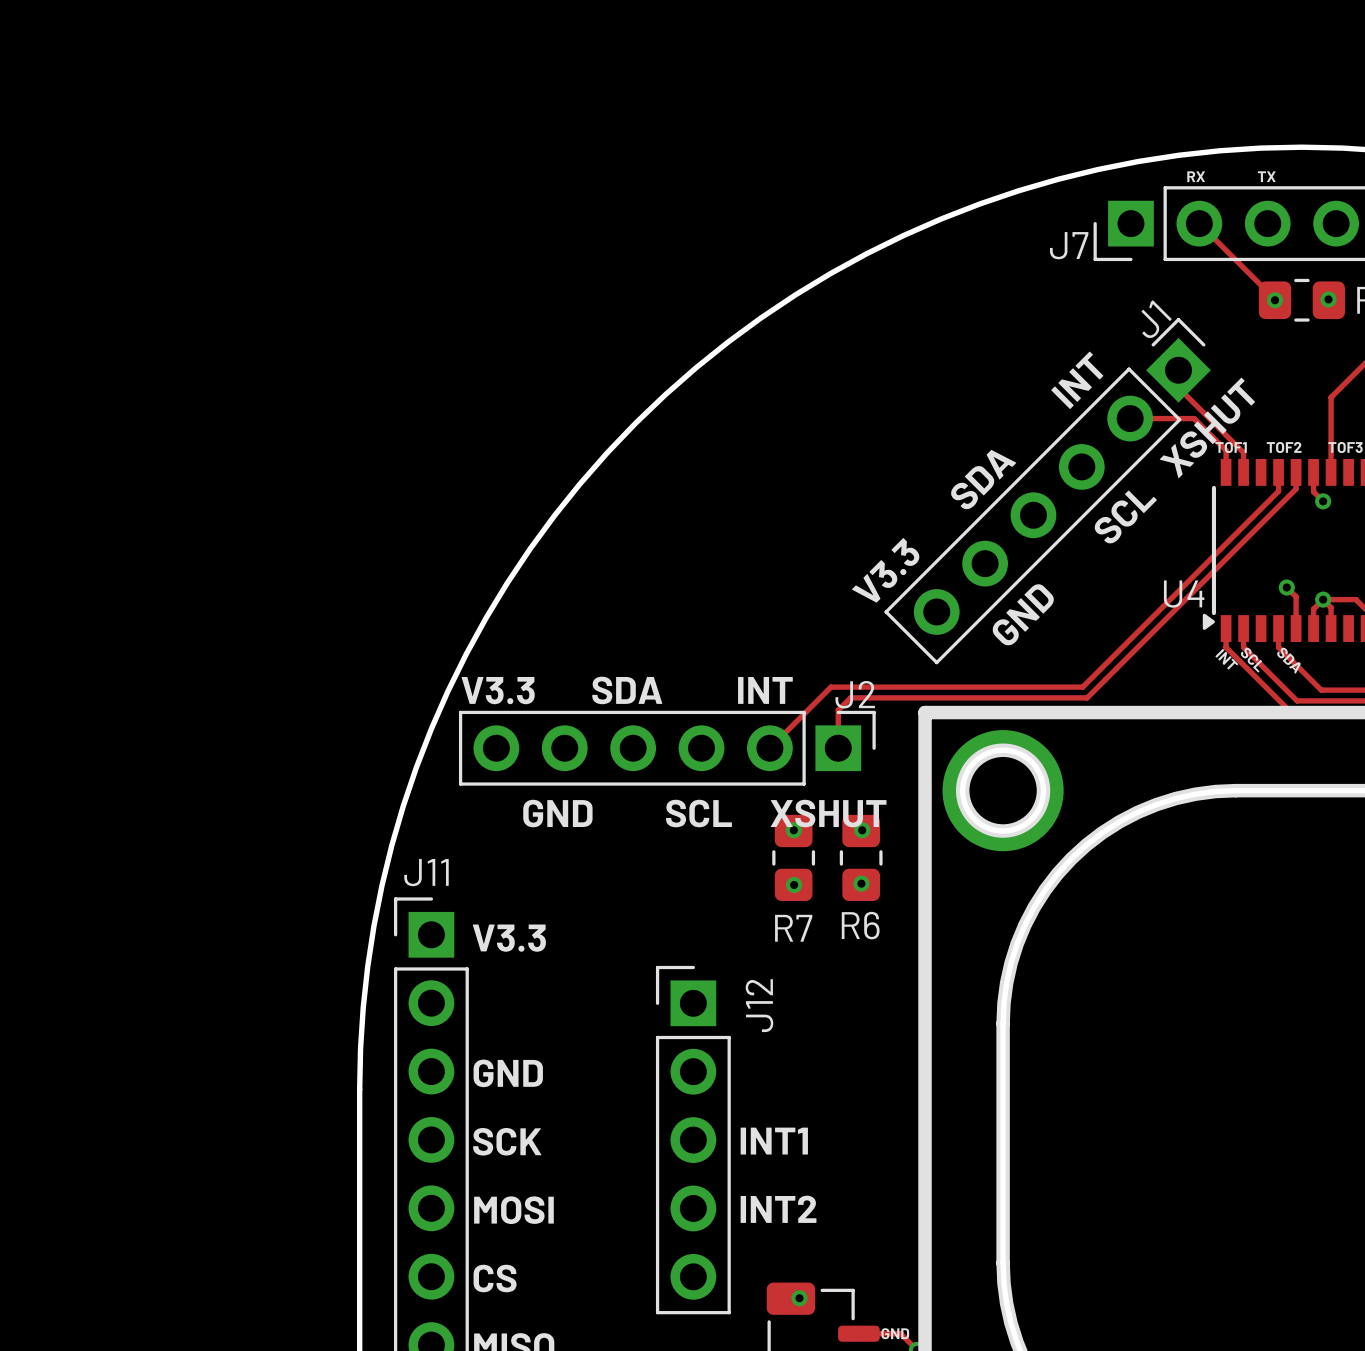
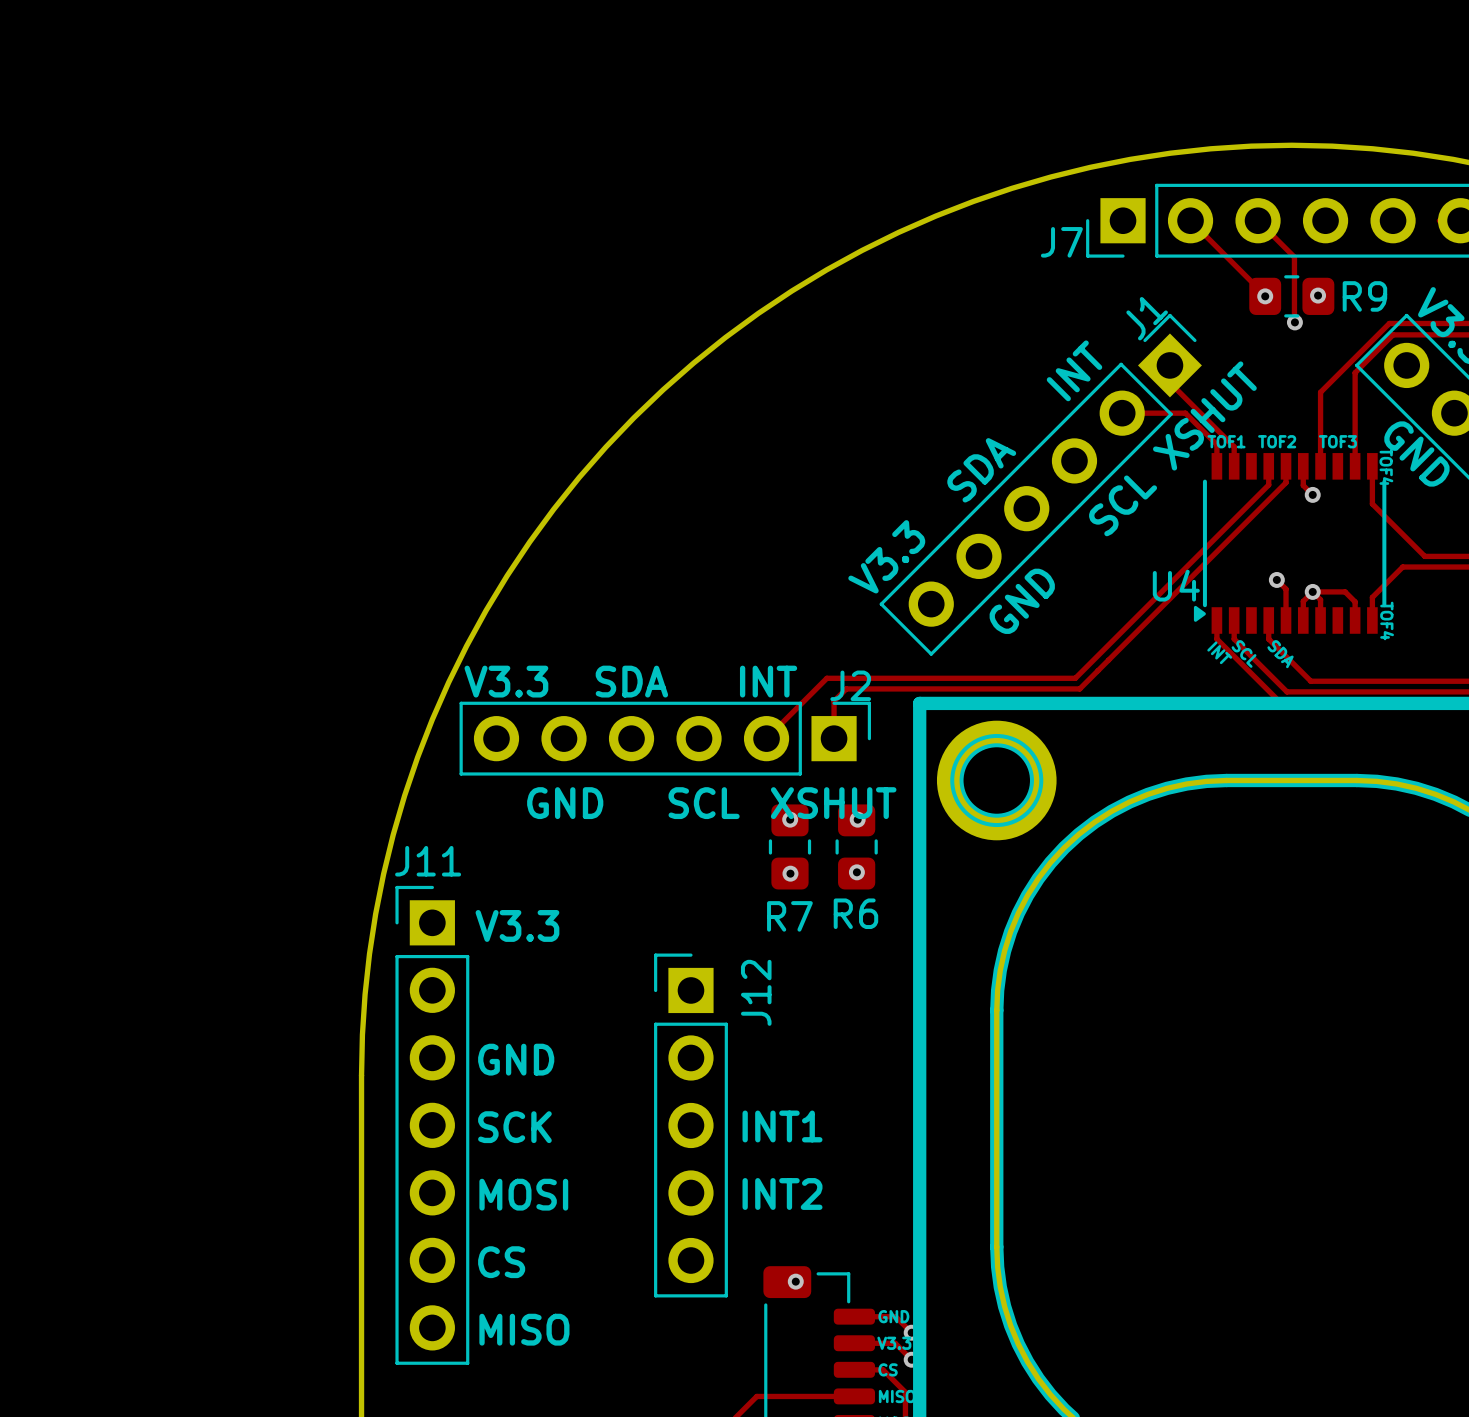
text: RX (1196, 176) -> none
text: TX (1266, 176) -> none
track: none -> (1258, 220) (1294, 257) (1294, 322)
via: none -> (1294, 322)

